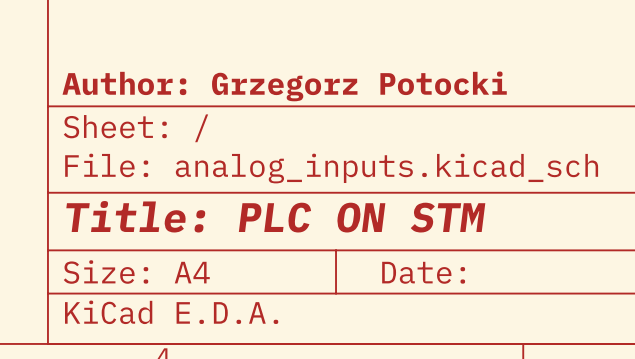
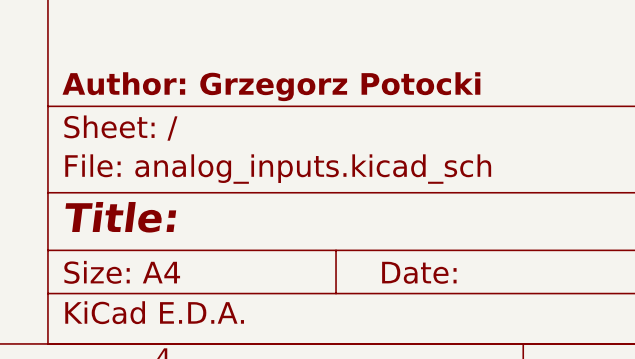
title block: Title: PLC ON STM (275, 216) -> Title: (120, 217)

